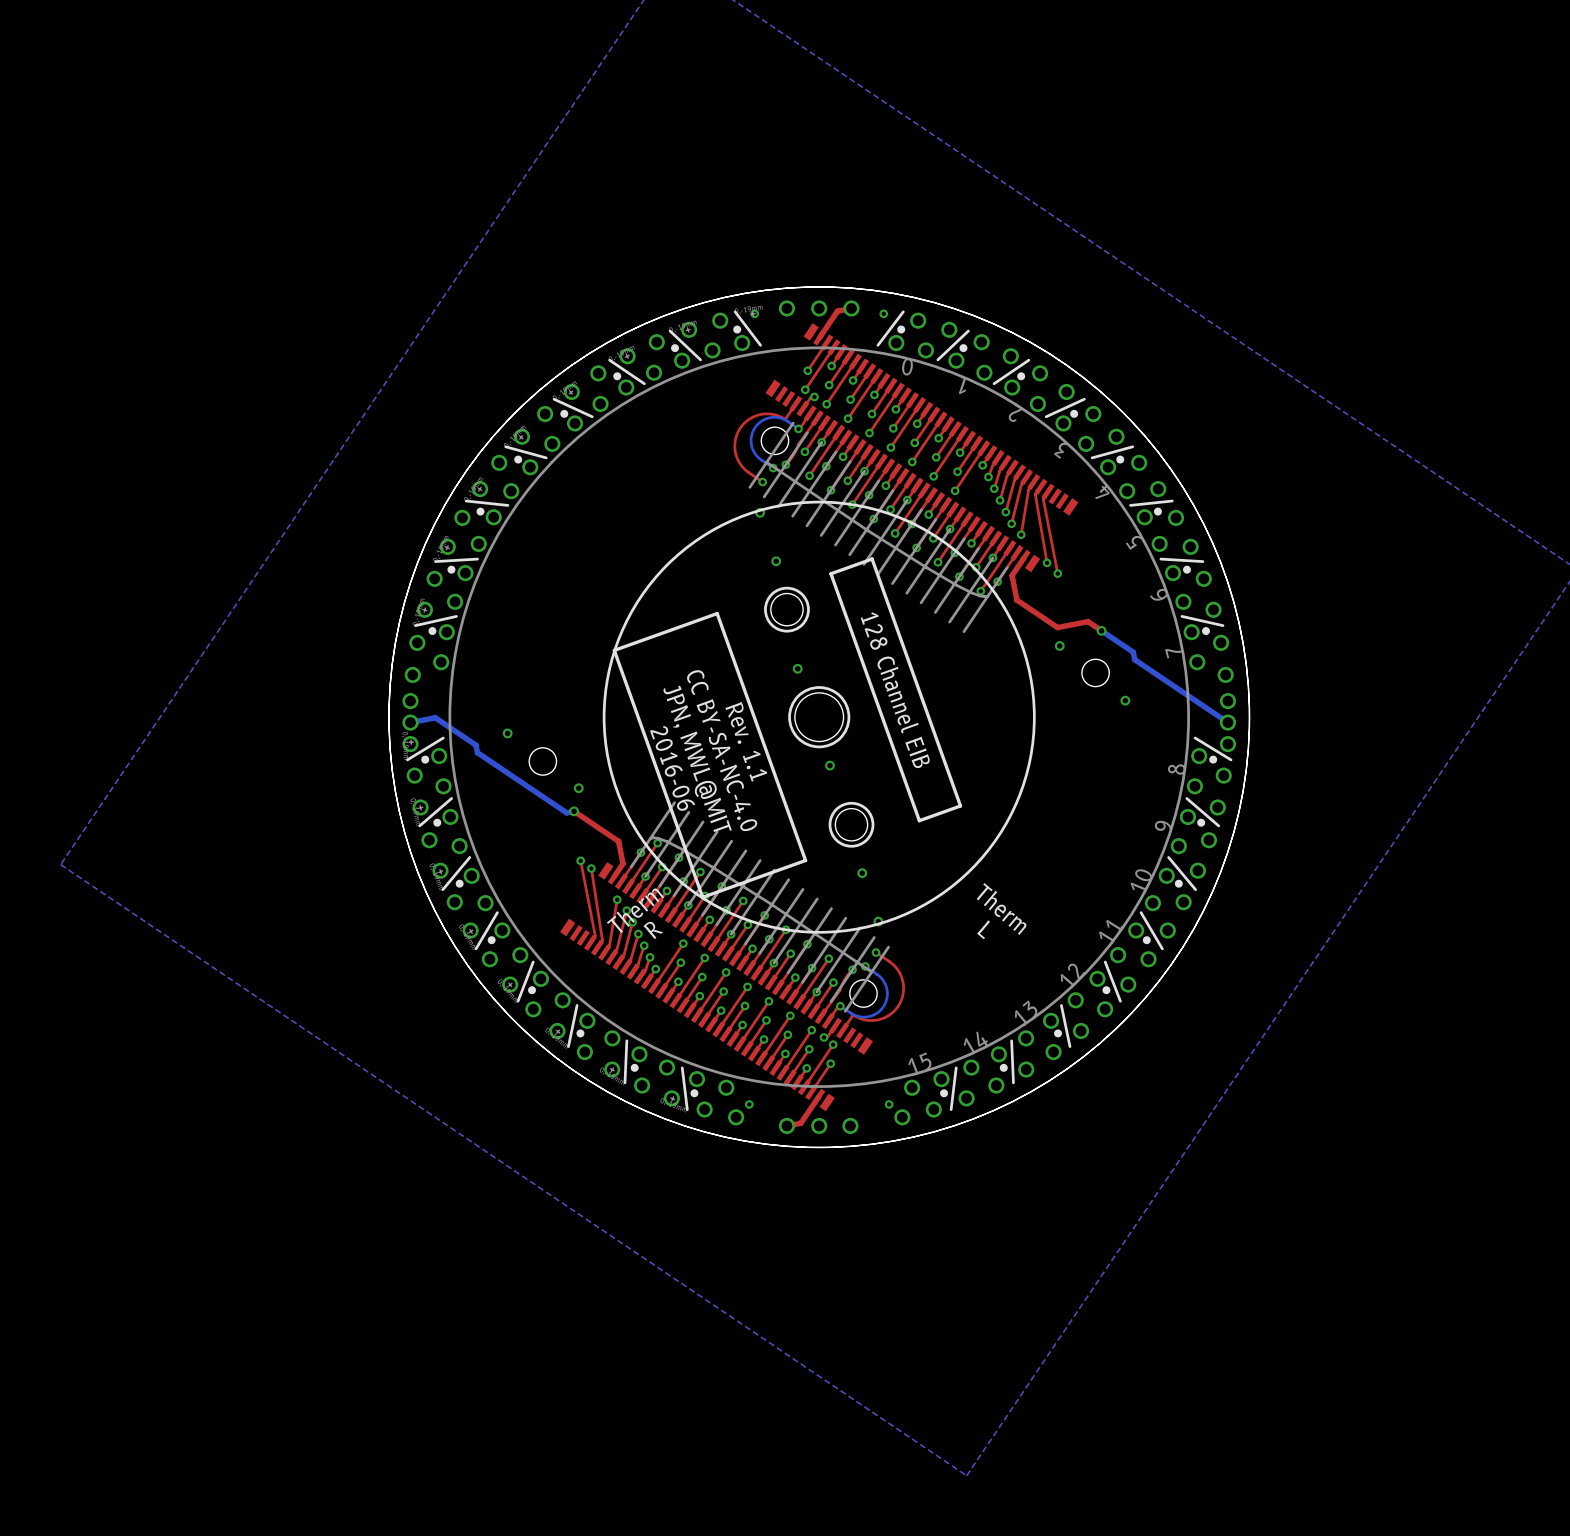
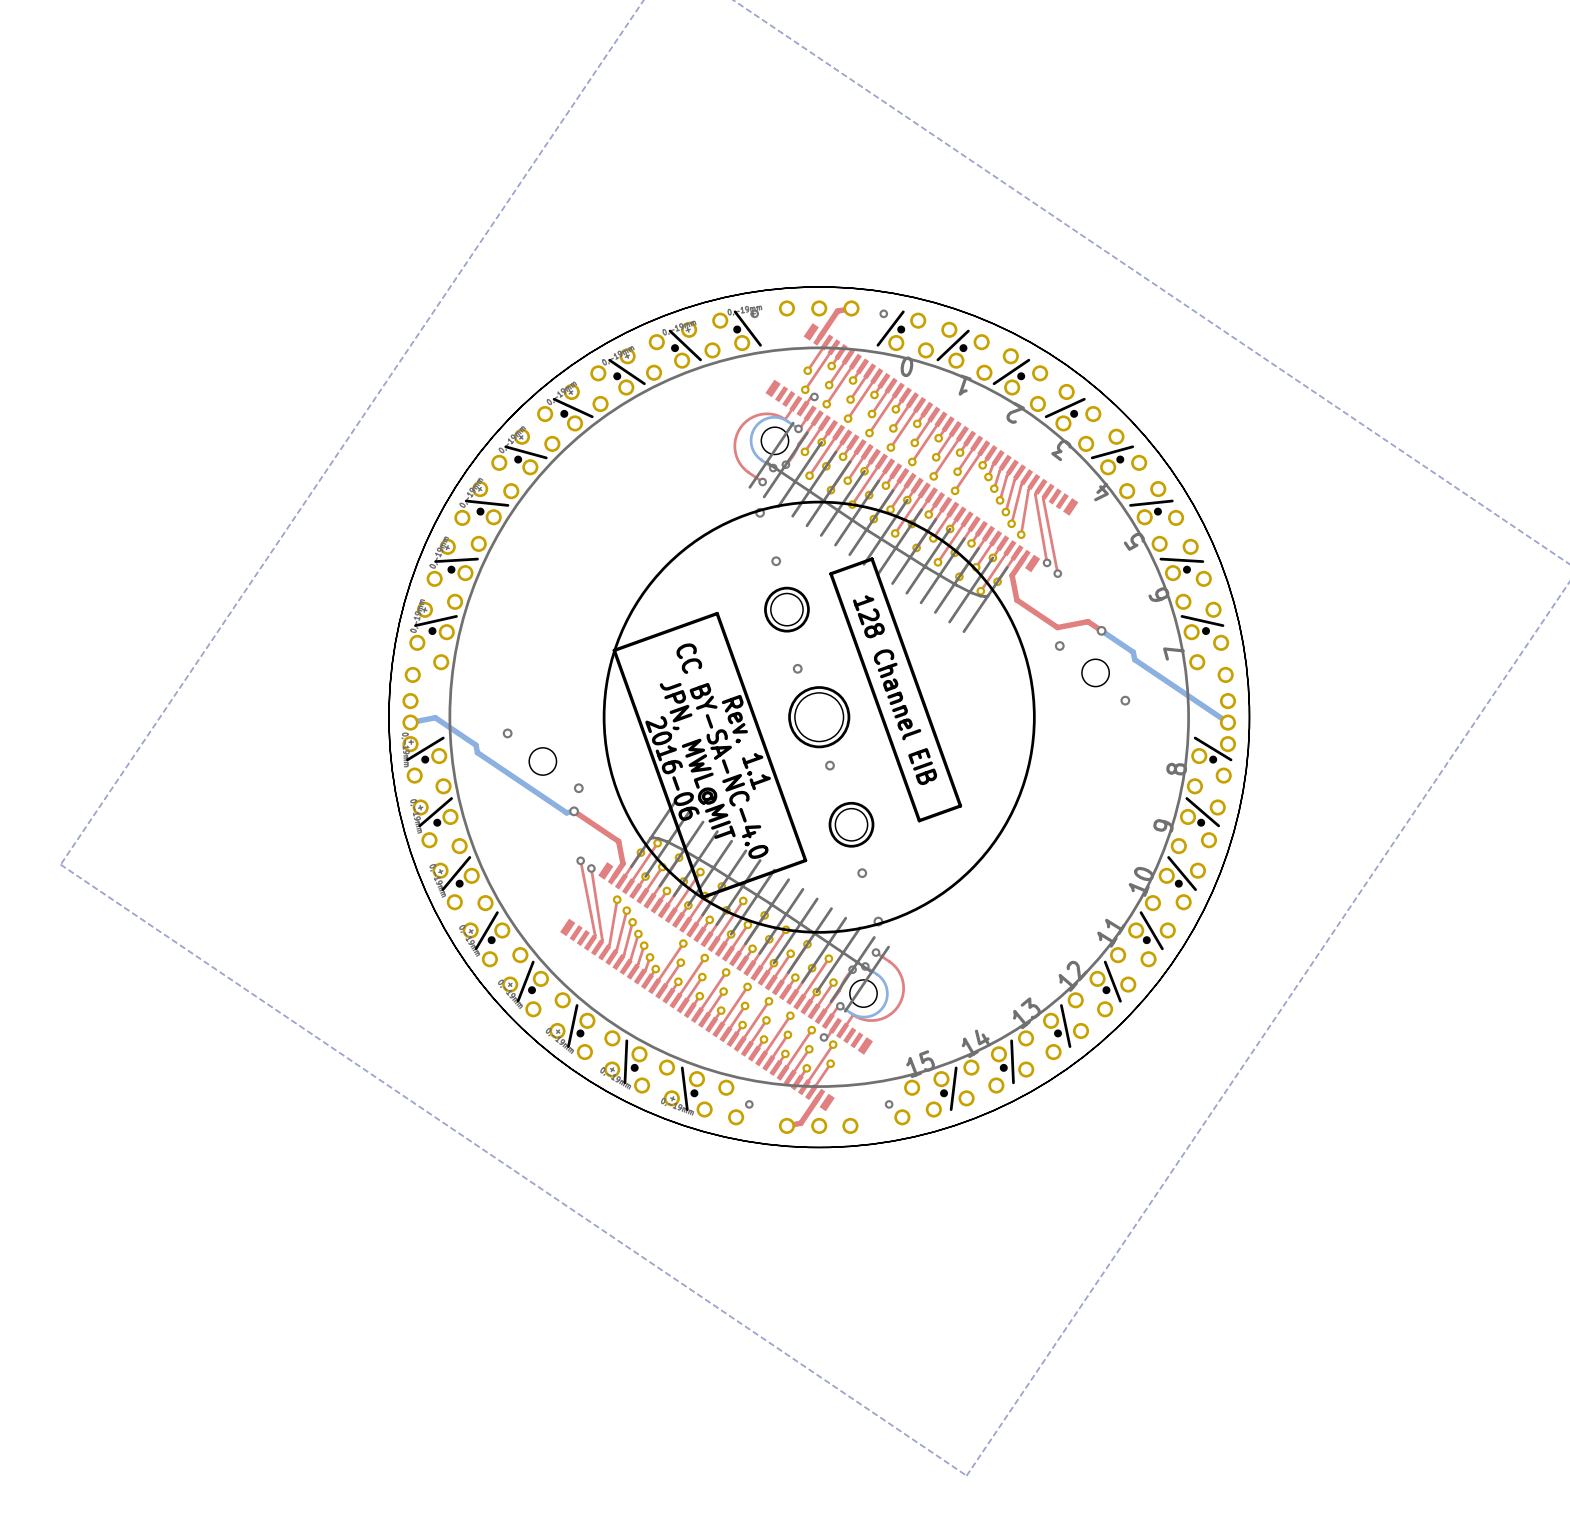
text: Therm (1001, 908) -> none
text: Therm (635, 910) -> none
text: L (983, 929) -> none
text: R (653, 930) -> none

